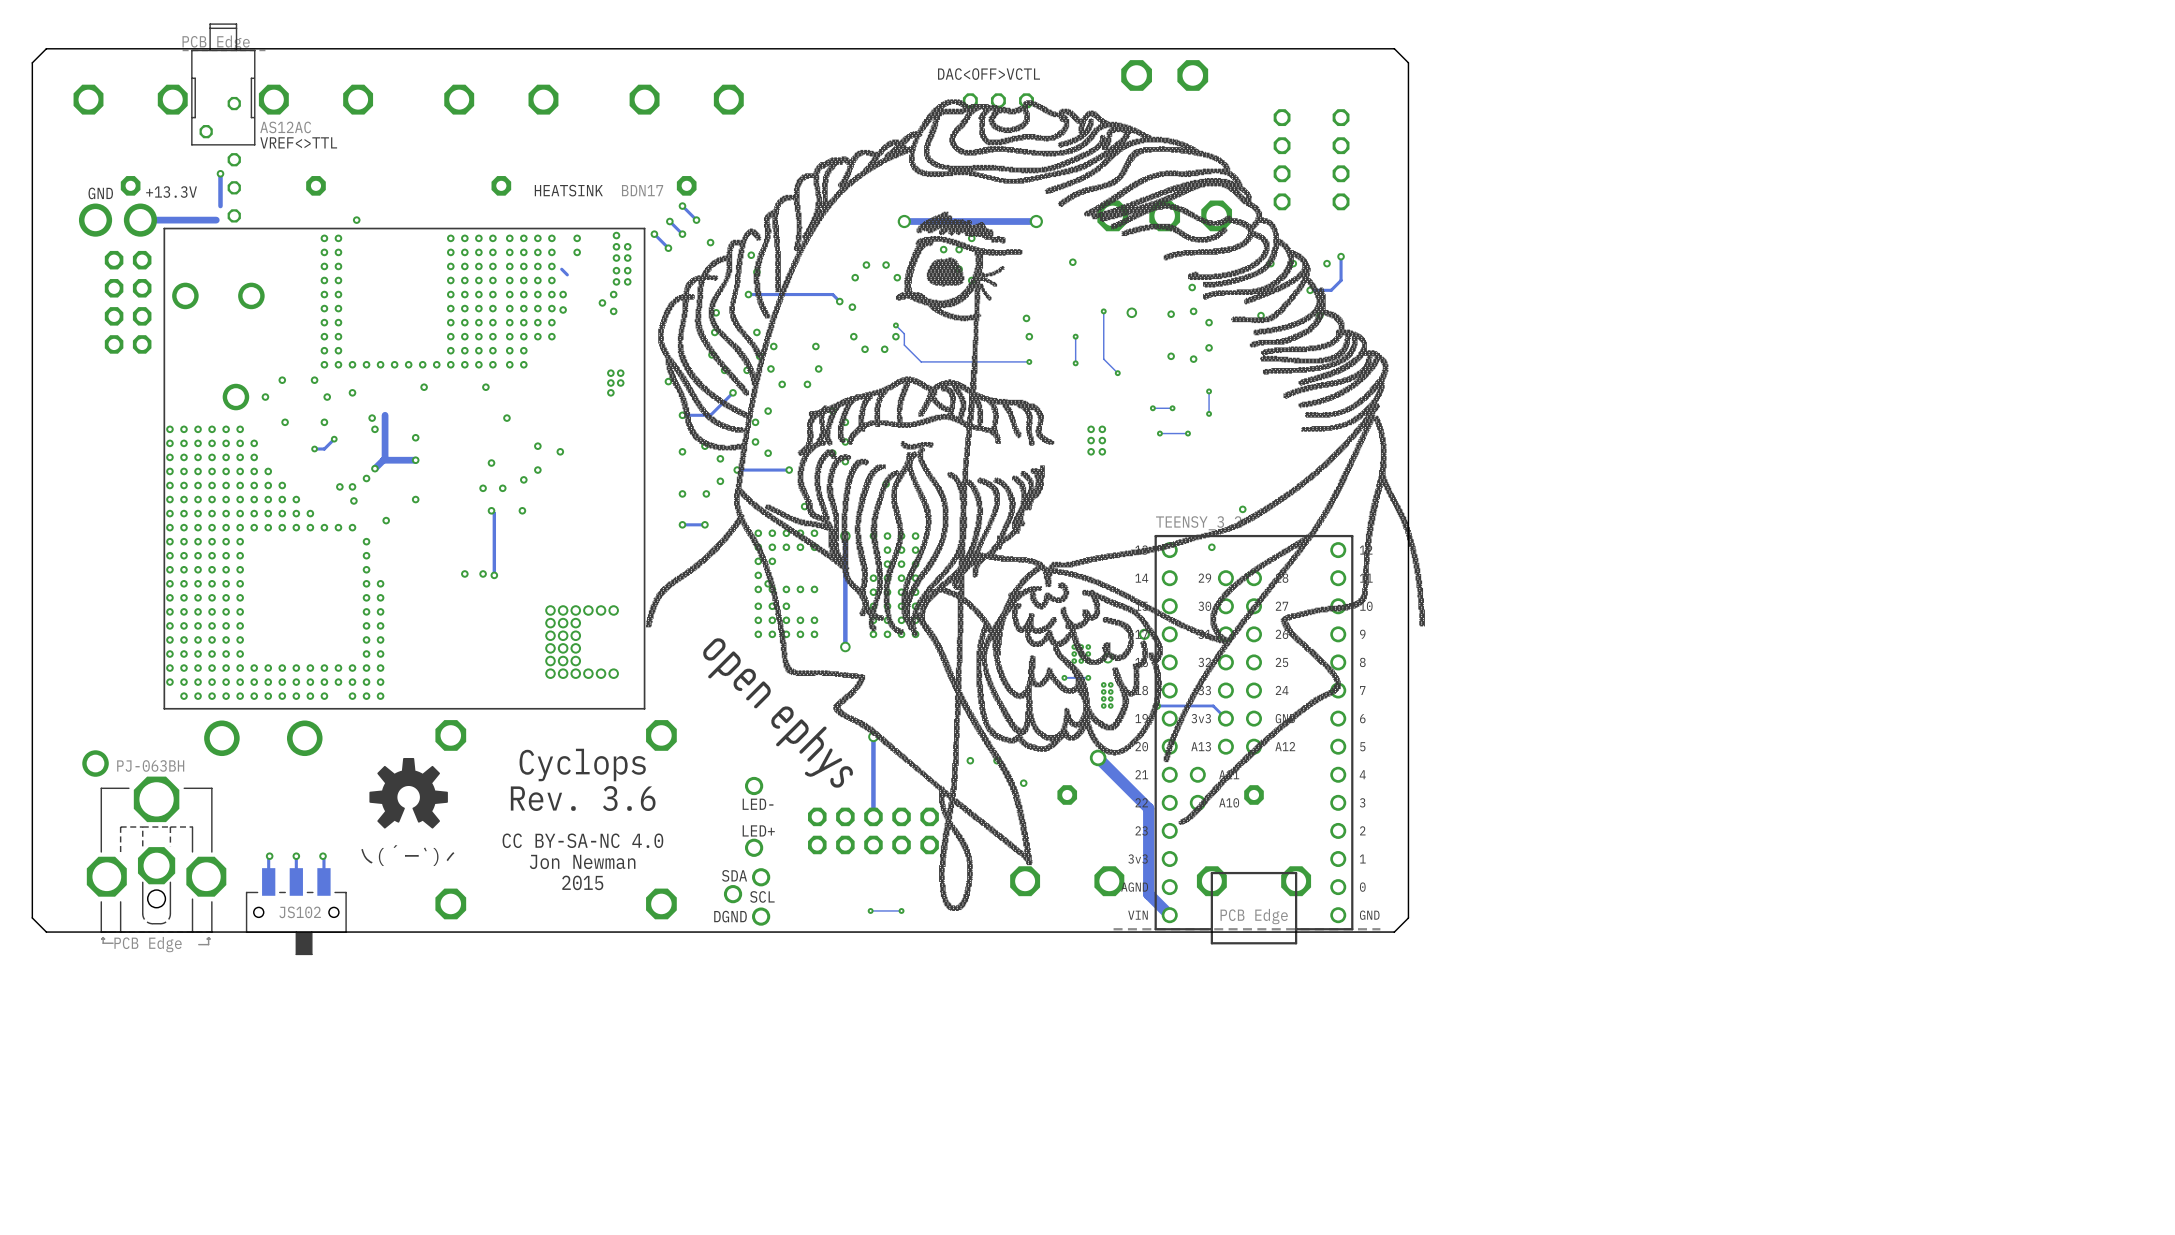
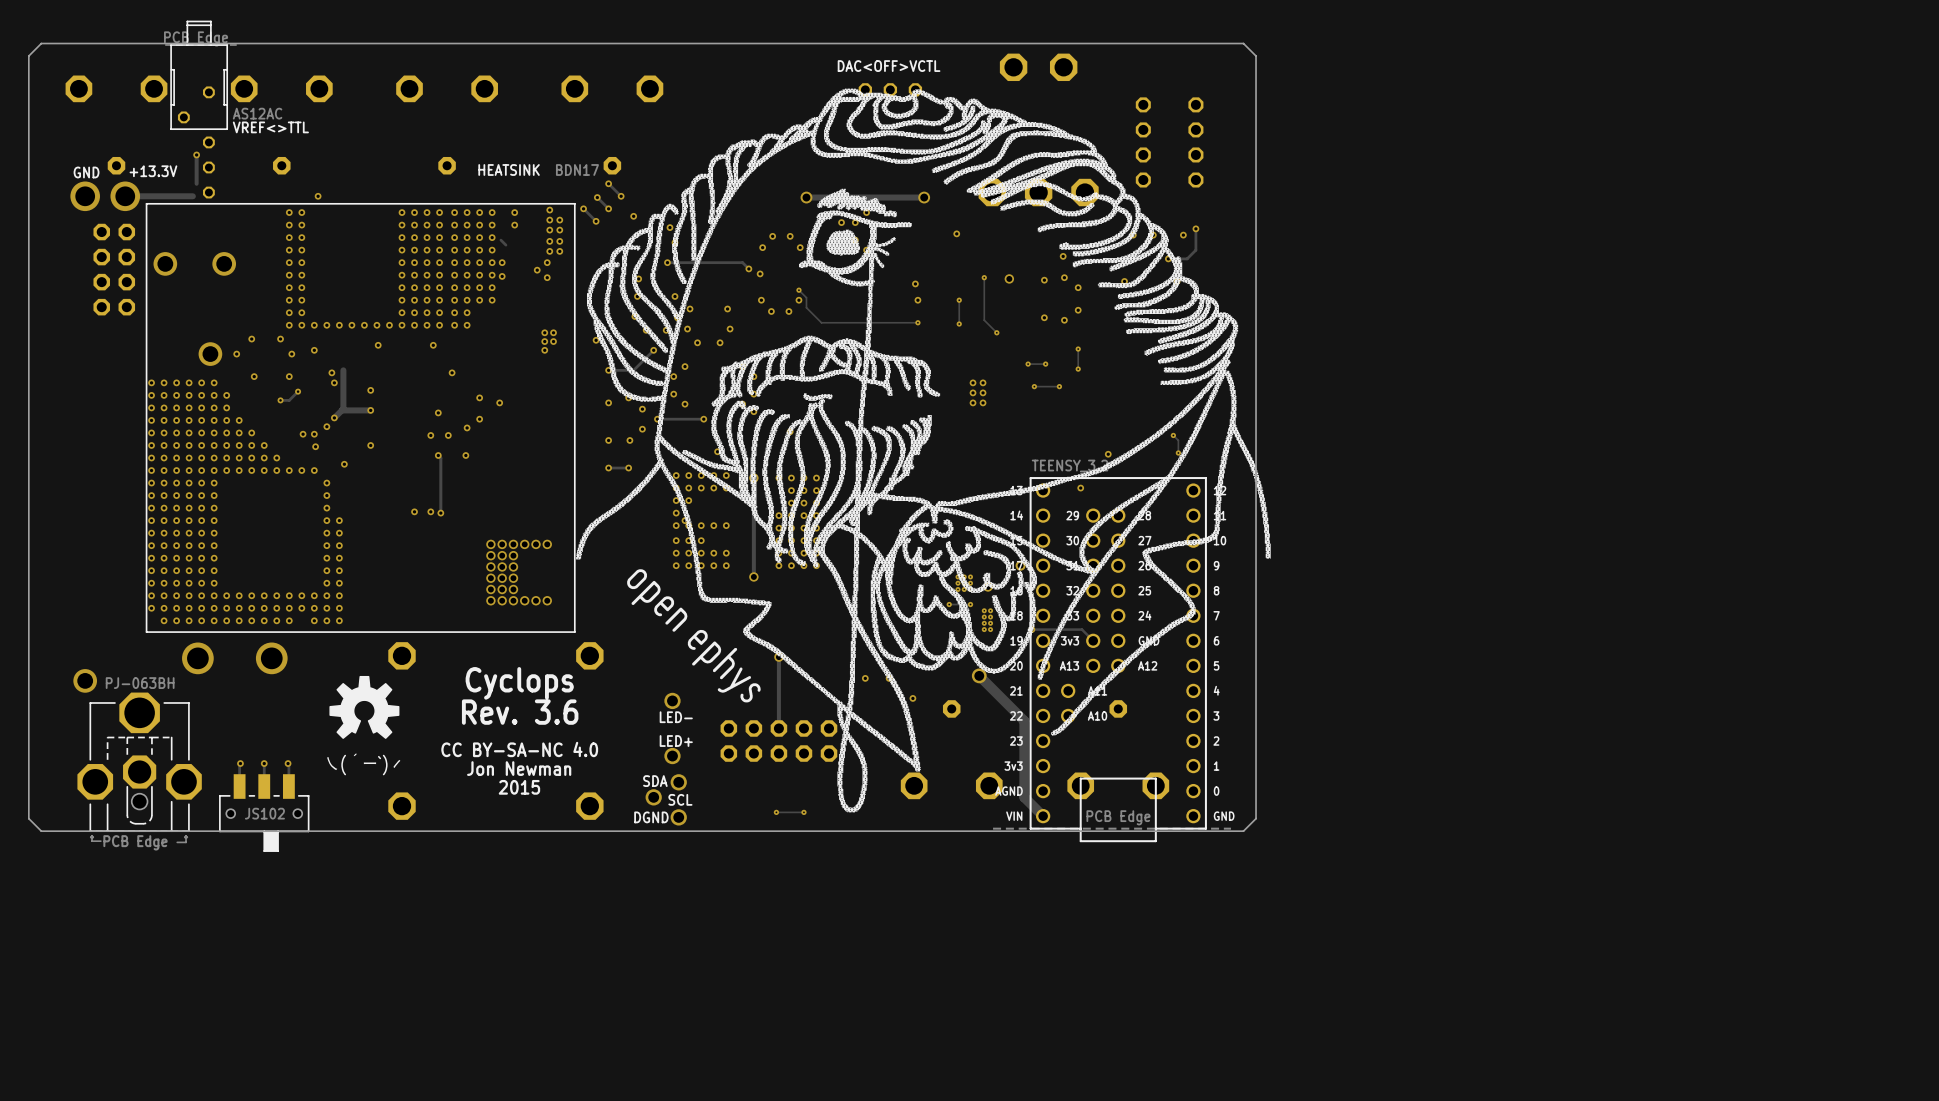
track: none -> (1173, 435) (1178, 440) (1178, 452)
via: none -> (1173, 435)
via: none -> (1178, 452)

